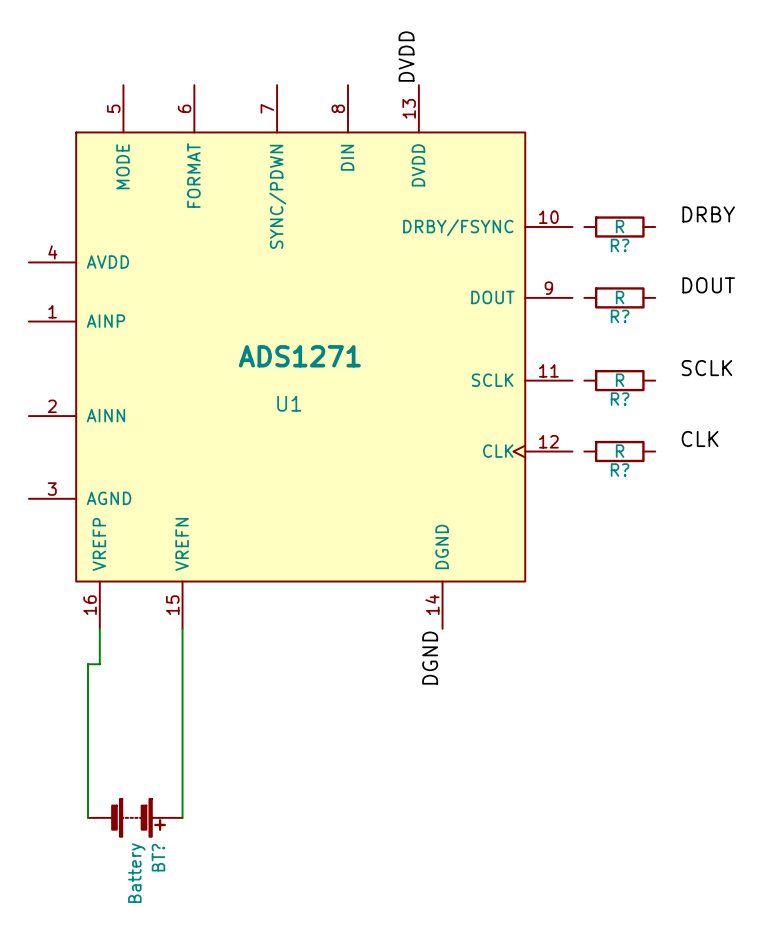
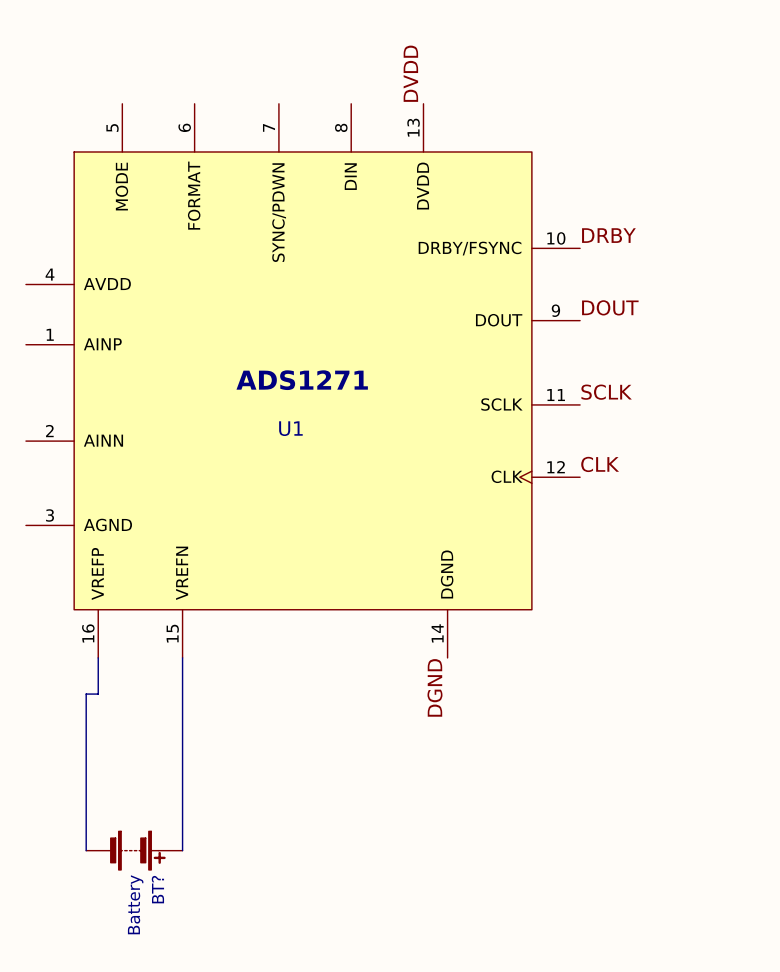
label position: DRBY (708, 214) -> DRBY (608, 235)
R?: R (619, 226) -> none
label position: DOUT (708, 285) -> DOUT (610, 307)
R?: R (619, 297) -> none
label position: SCLK (706, 368) -> SCLK (606, 392)
R?: R (619, 380) -> none
label position: CLK (700, 438) -> CLK (600, 464)
R?: R (619, 451) -> none

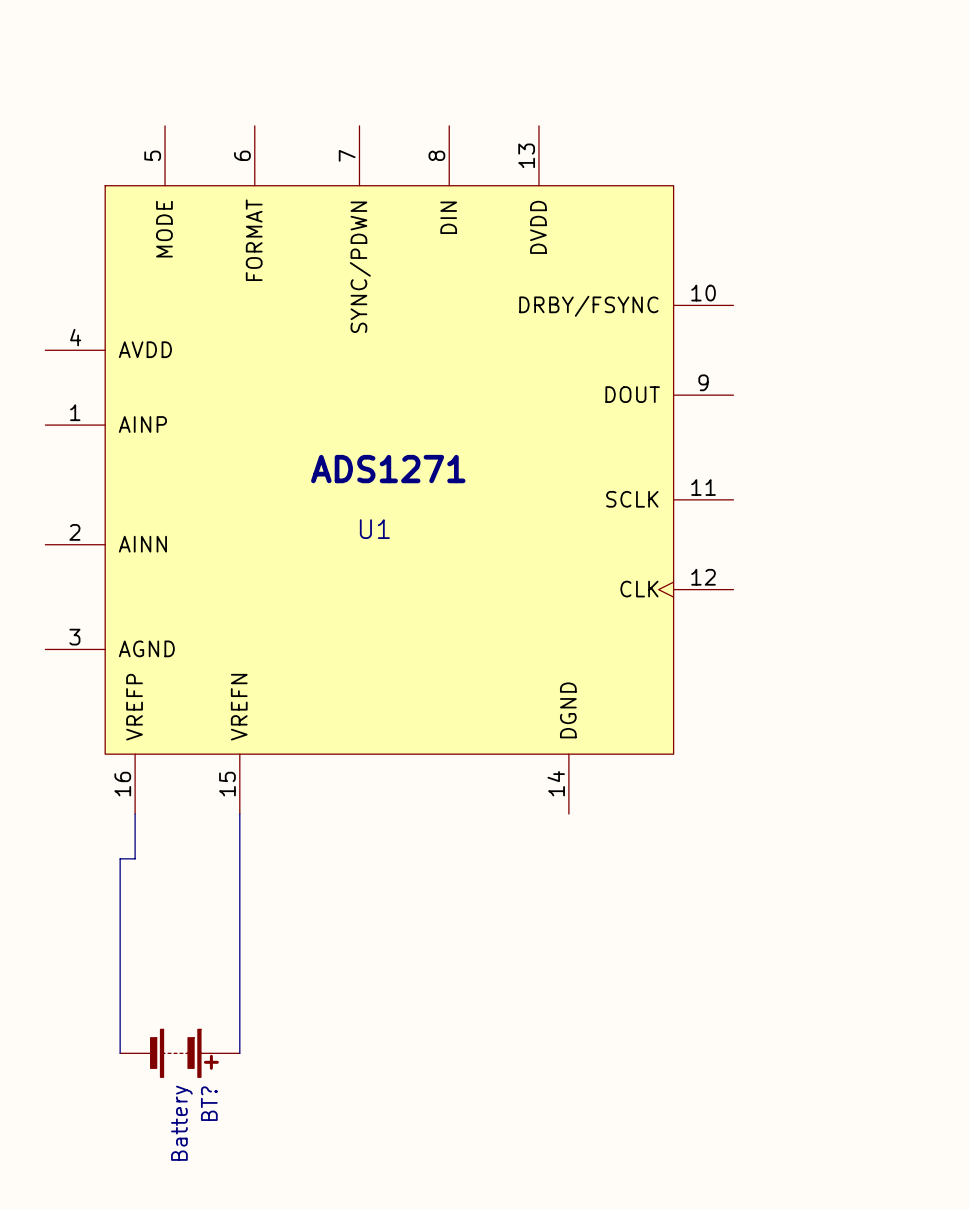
label: DVDD (410, 73) -> none
label: DRBY (608, 235) -> none
label: DOUT (610, 307) -> none
label: SCLK (606, 392) -> none
label: CLK (600, 464) -> none
label: DGND (434, 687) -> none

